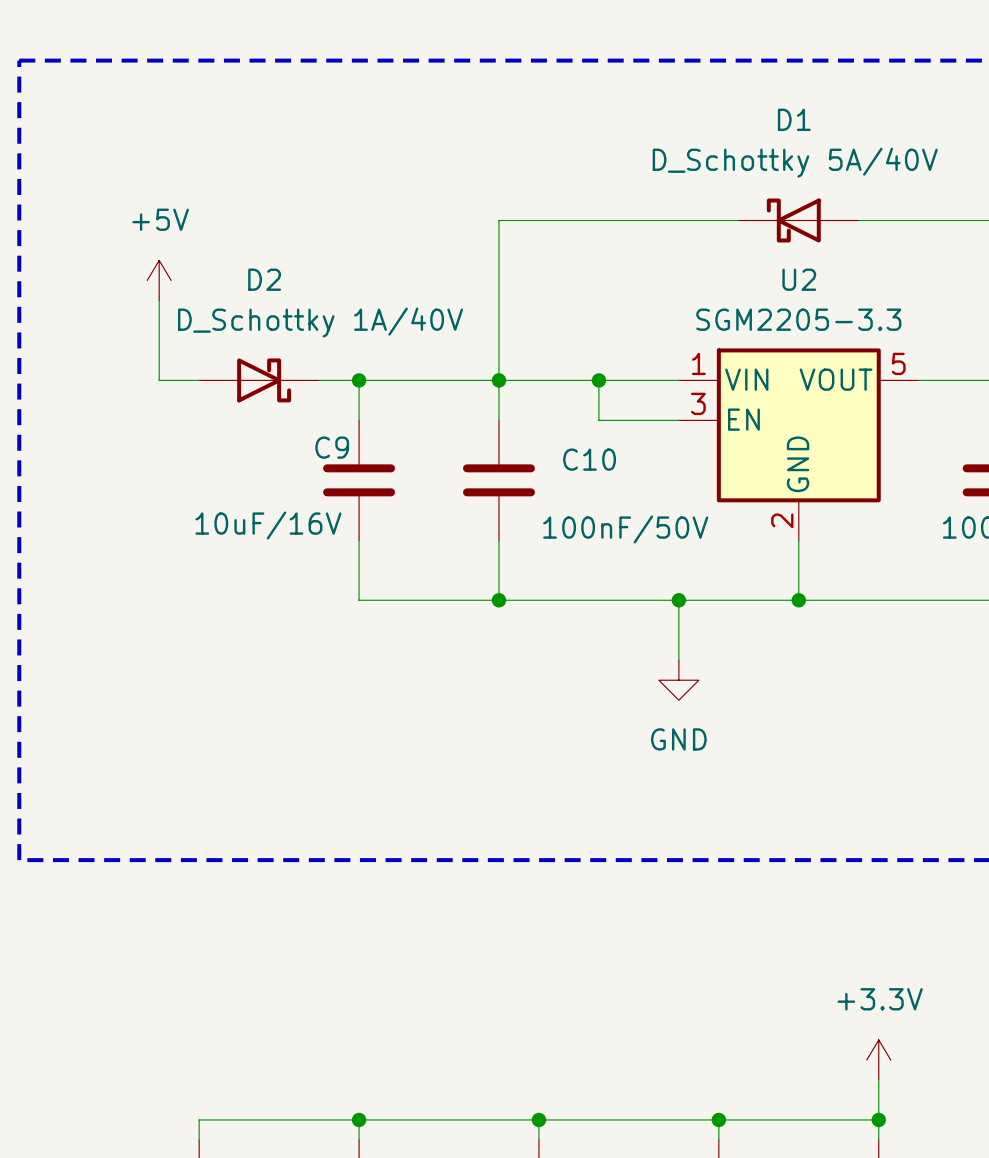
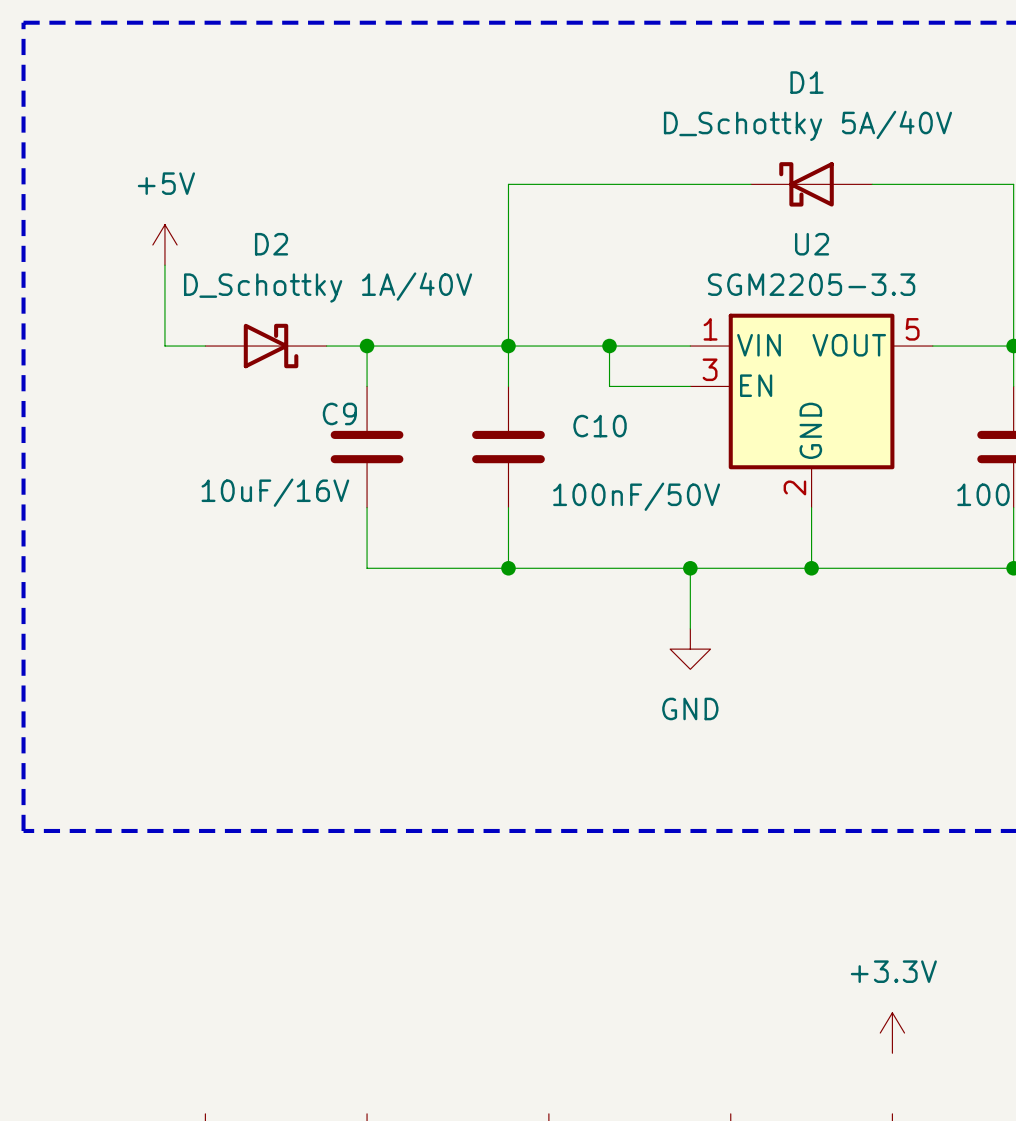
wire: (878, 1079) (878, 1139) -> none
wire: (359, 1119) (359, 1139) -> none
junction: (359, 1119) -> none
wire: (538, 1119) (538, 1139) -> none
junction: (538, 1119) -> none
wire: (718, 1119) (718, 1139) -> none
junction: (718, 1119) -> none
wire: (878, 1119) (199, 1119) (199, 1139) -> none
junction: (878, 1119) -> none

